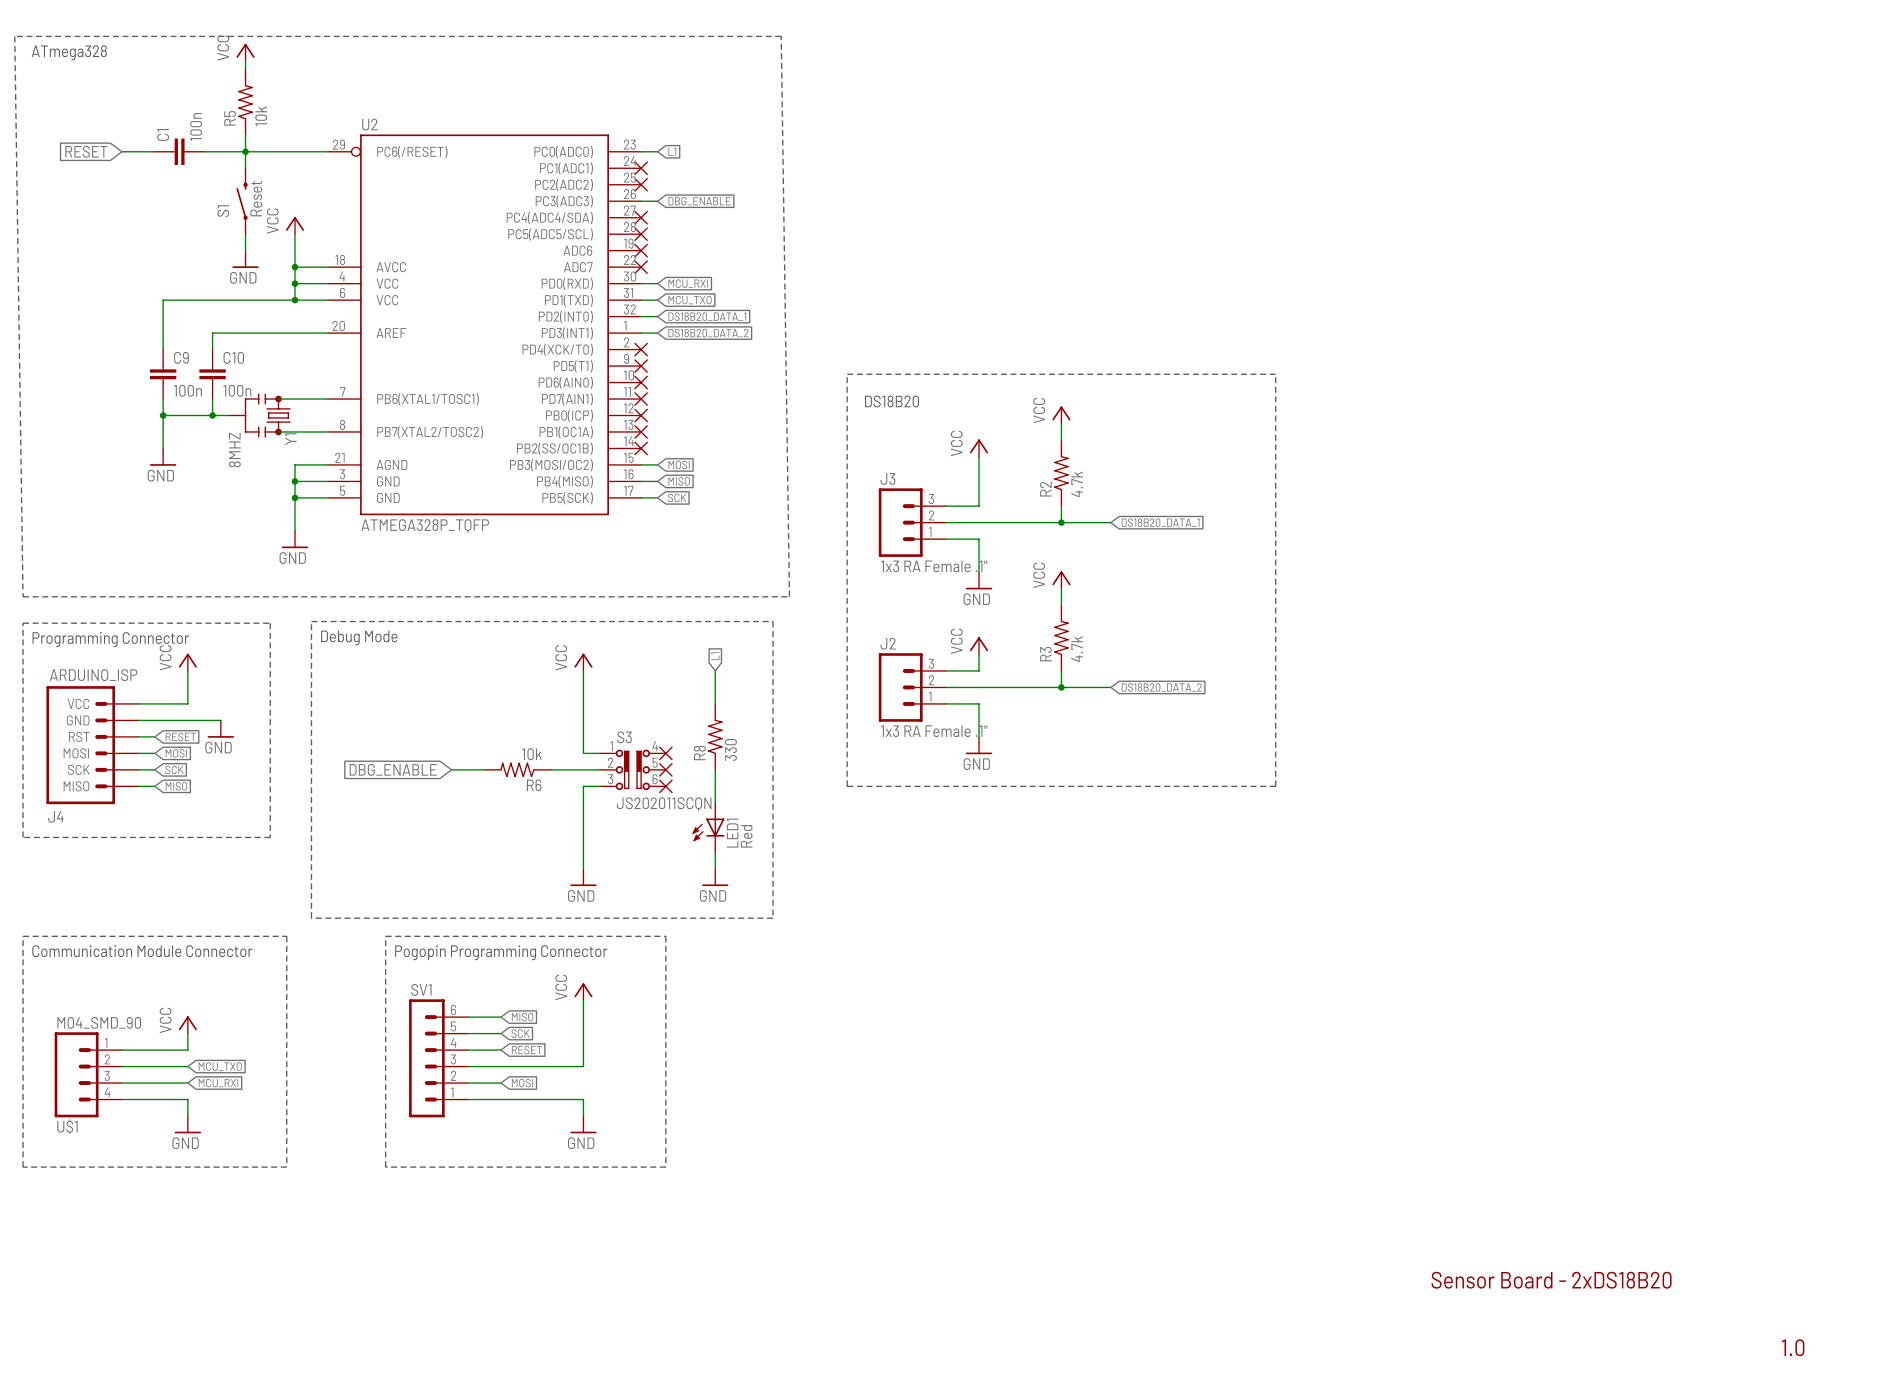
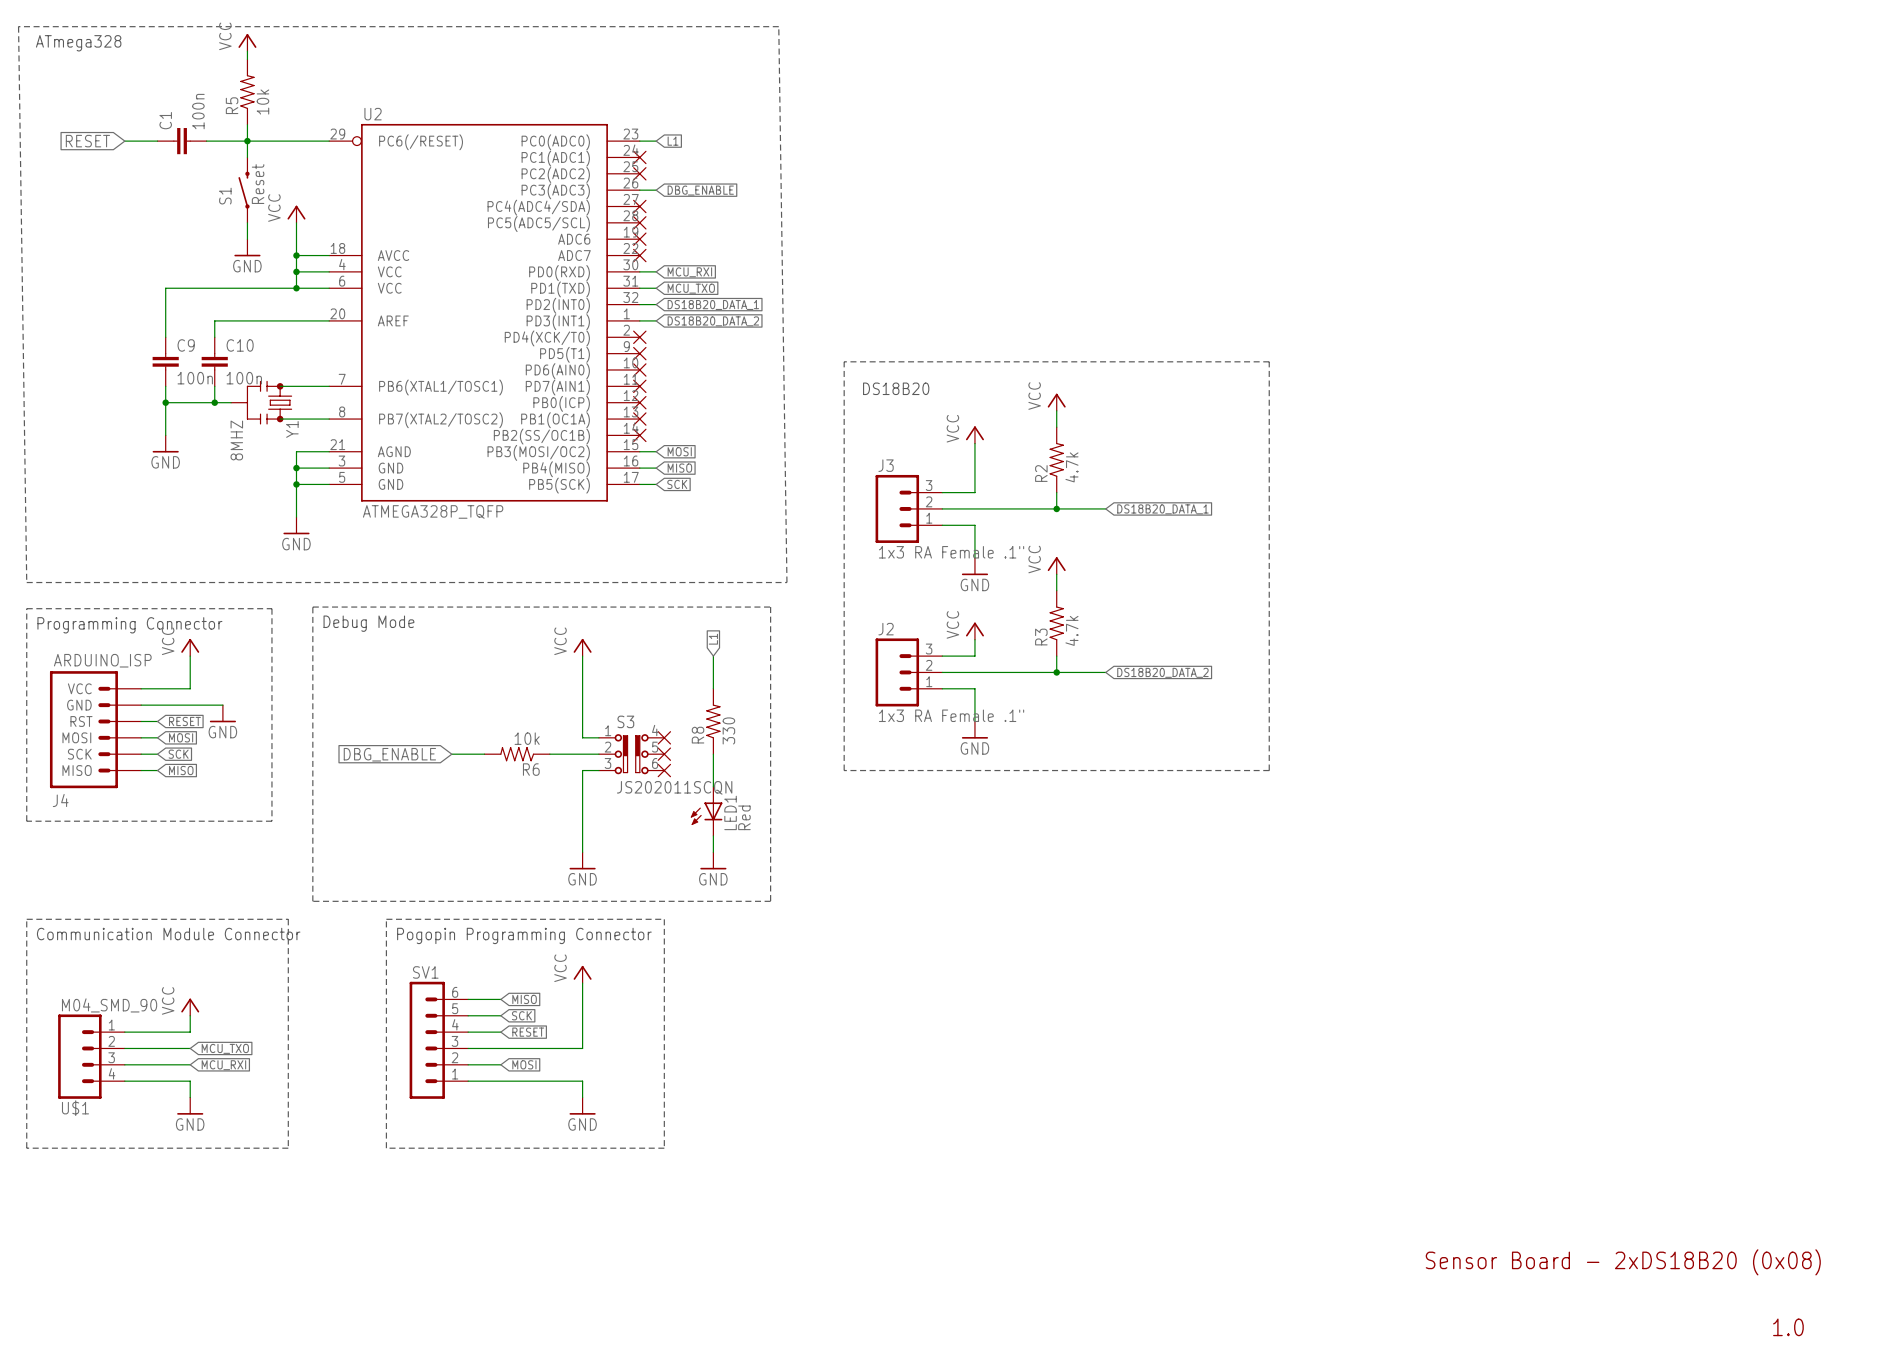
text: Sensor Board - 2xDS18B20 (1551, 1280) -> Sensor Board - 2xDS18B20 (0x08) (1623, 1262)

